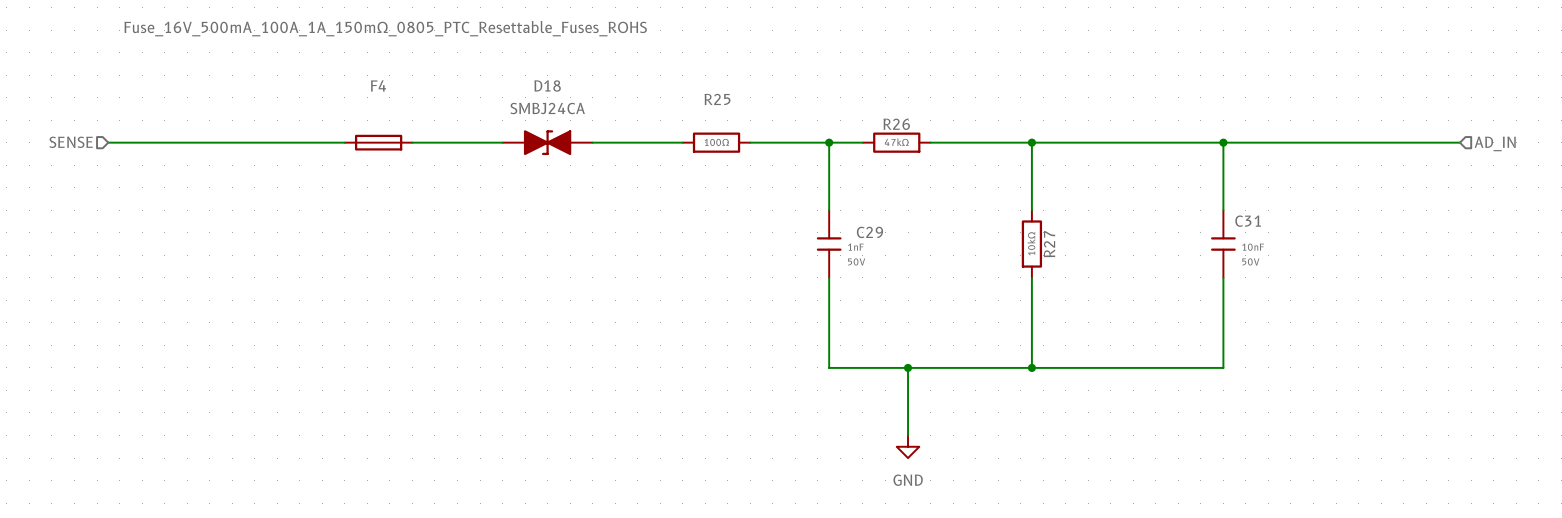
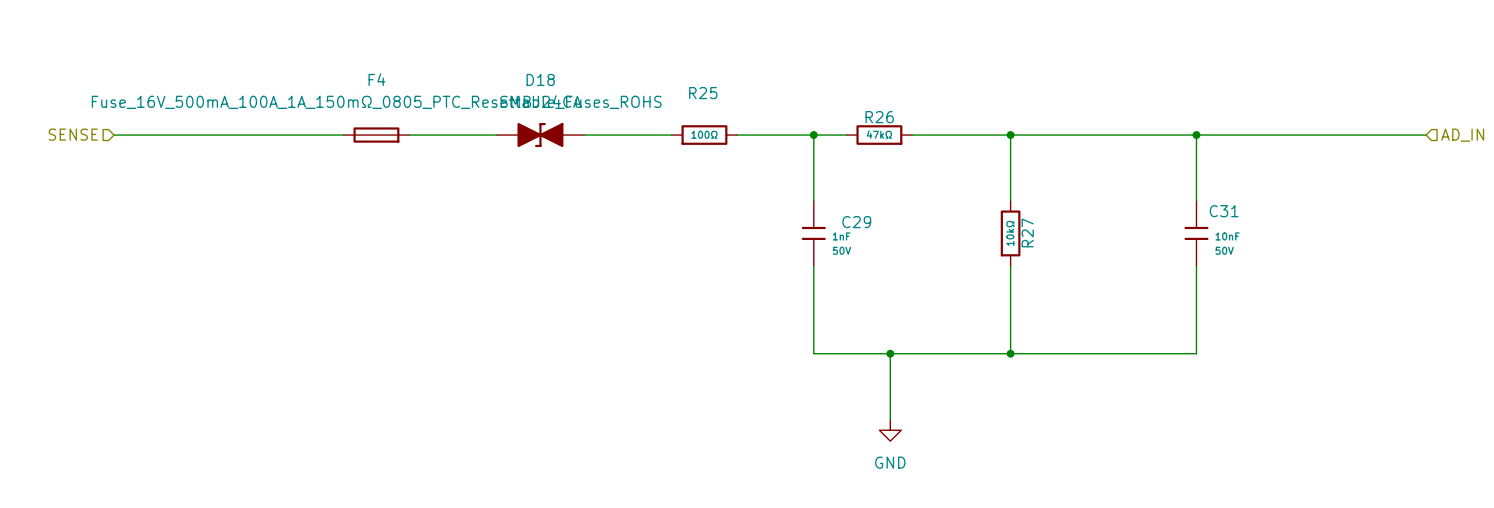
F4 value position: Fuse_16V_500mA_100A_1A_150mΩ_0805_PTC_Resettable_Fuses_ROHS (385, 28) -> Fuse_16V_500mA_100A_1A_150mΩ_0805_PTC_Resettable_Fuses_ROHS (376, 102)

